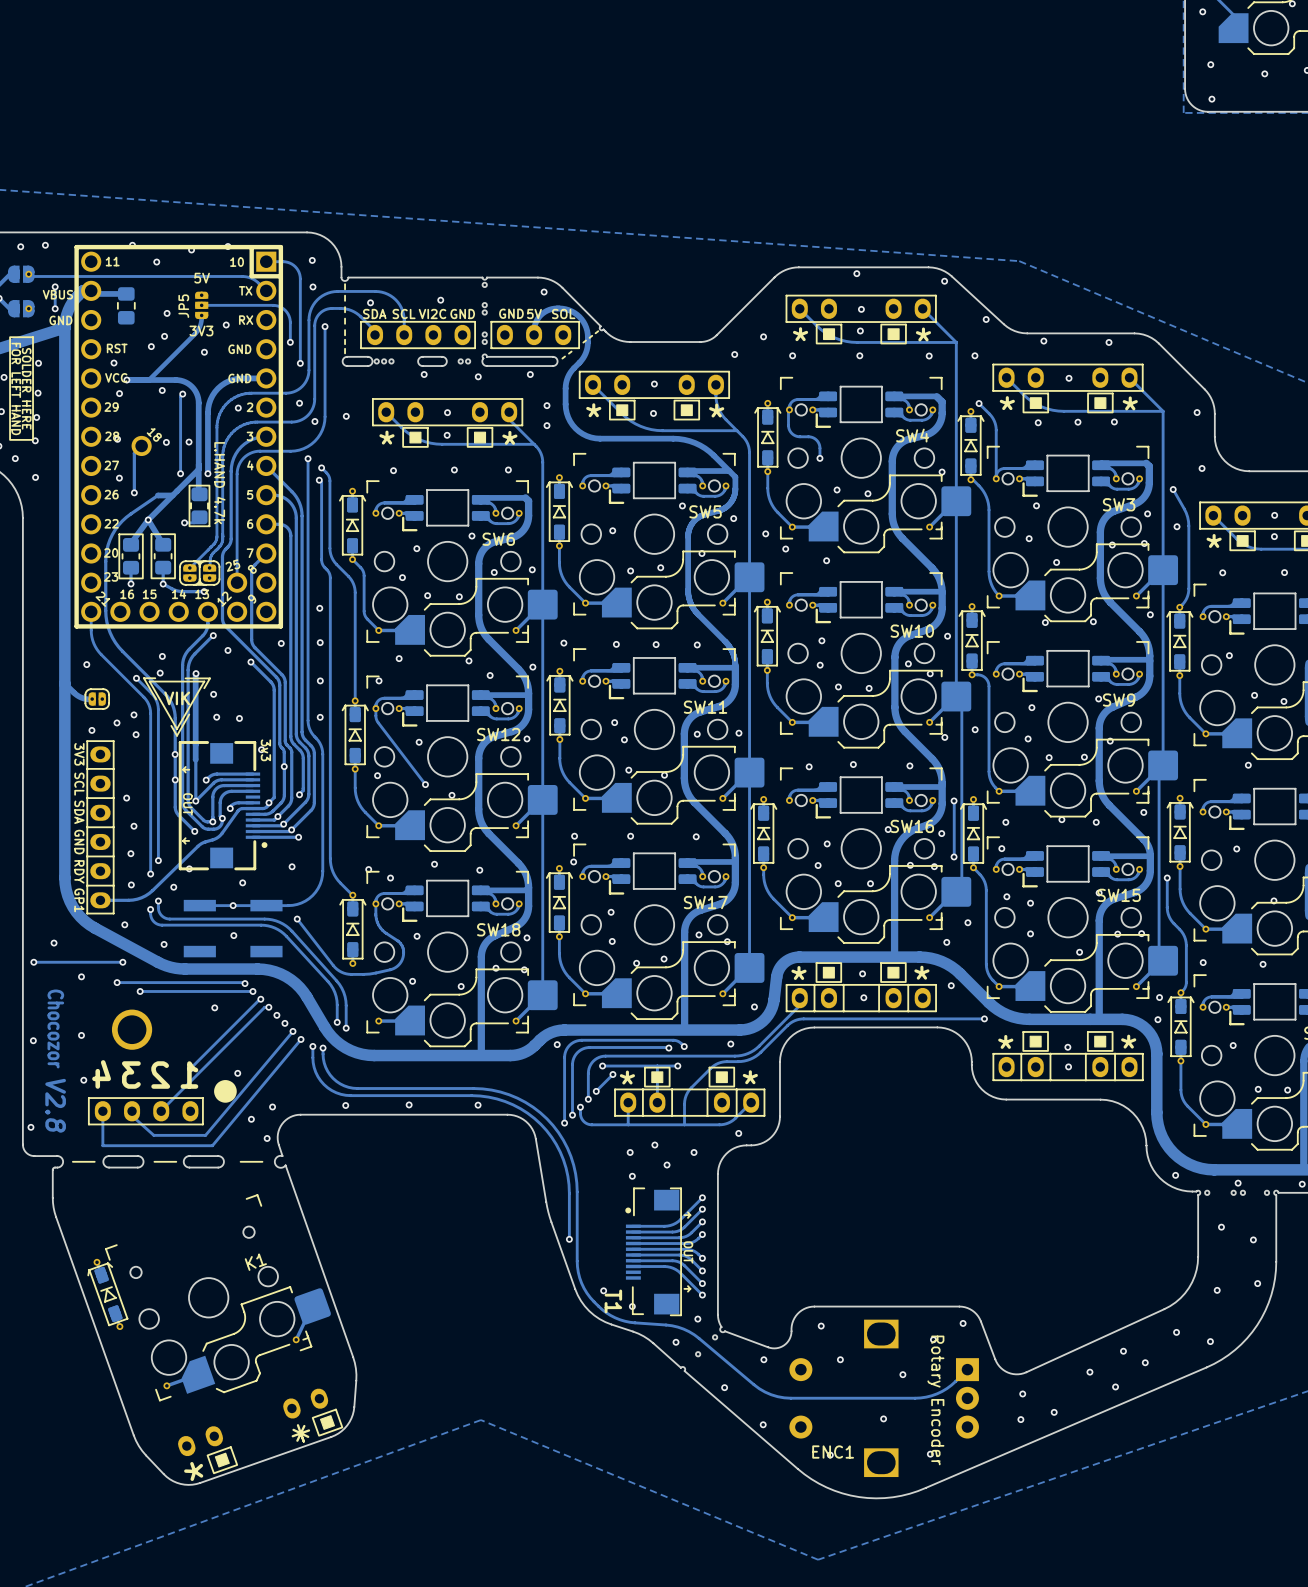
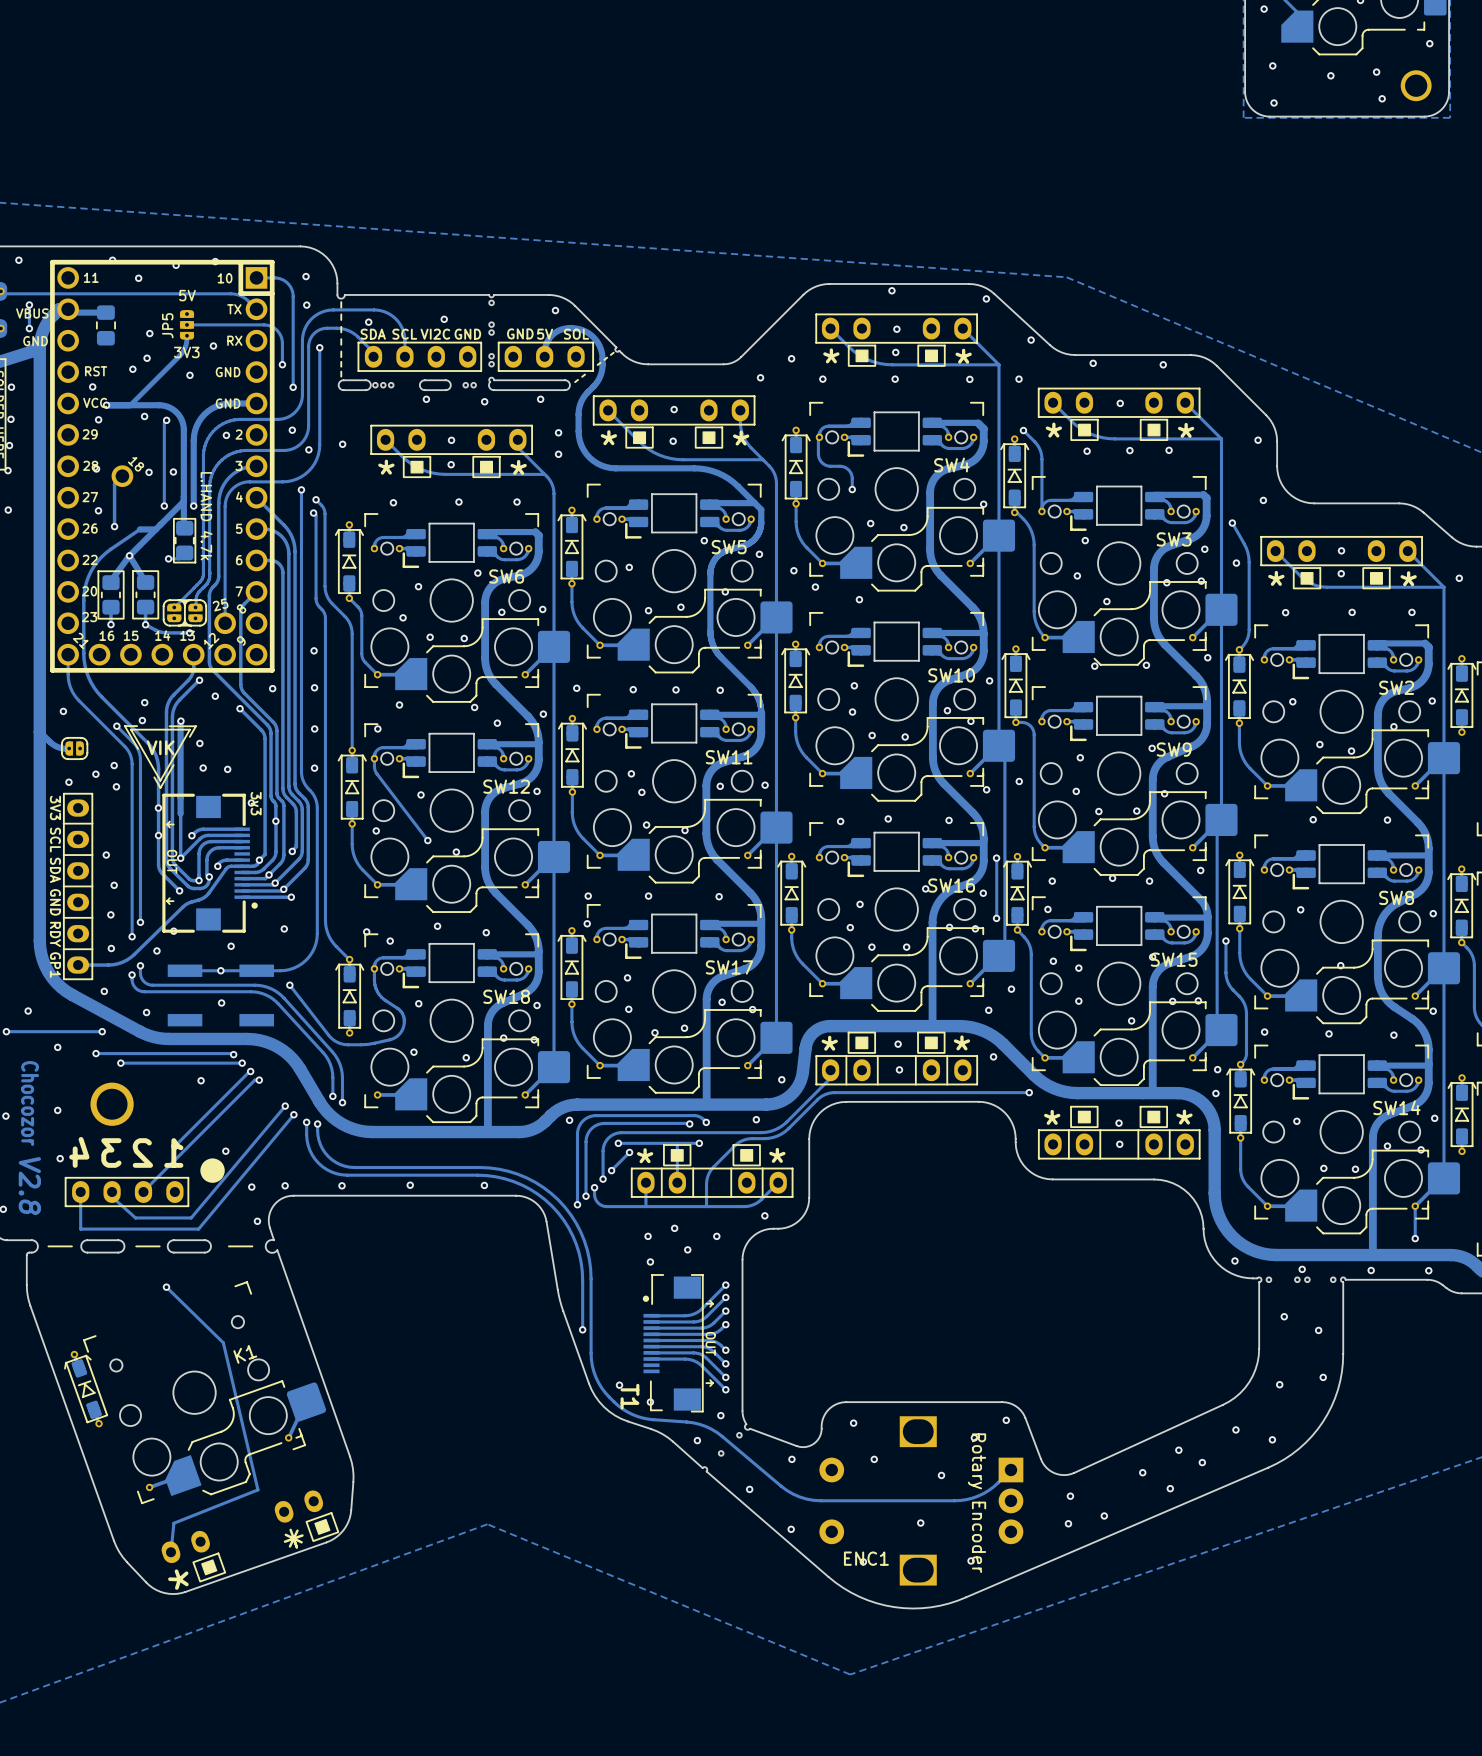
via: (276, 1015) -> none
via: (284, 1023) -> none
via: none -> (285, 1185)
via: none -> (251, 1187)
via: (272, 1107) -> none
via: (251, 1119) -> none
track: none -> (166, 1287) (223, 1342) (257, 1489) (173, 1523) (170, 1552)
via: none -> (166, 1287)

